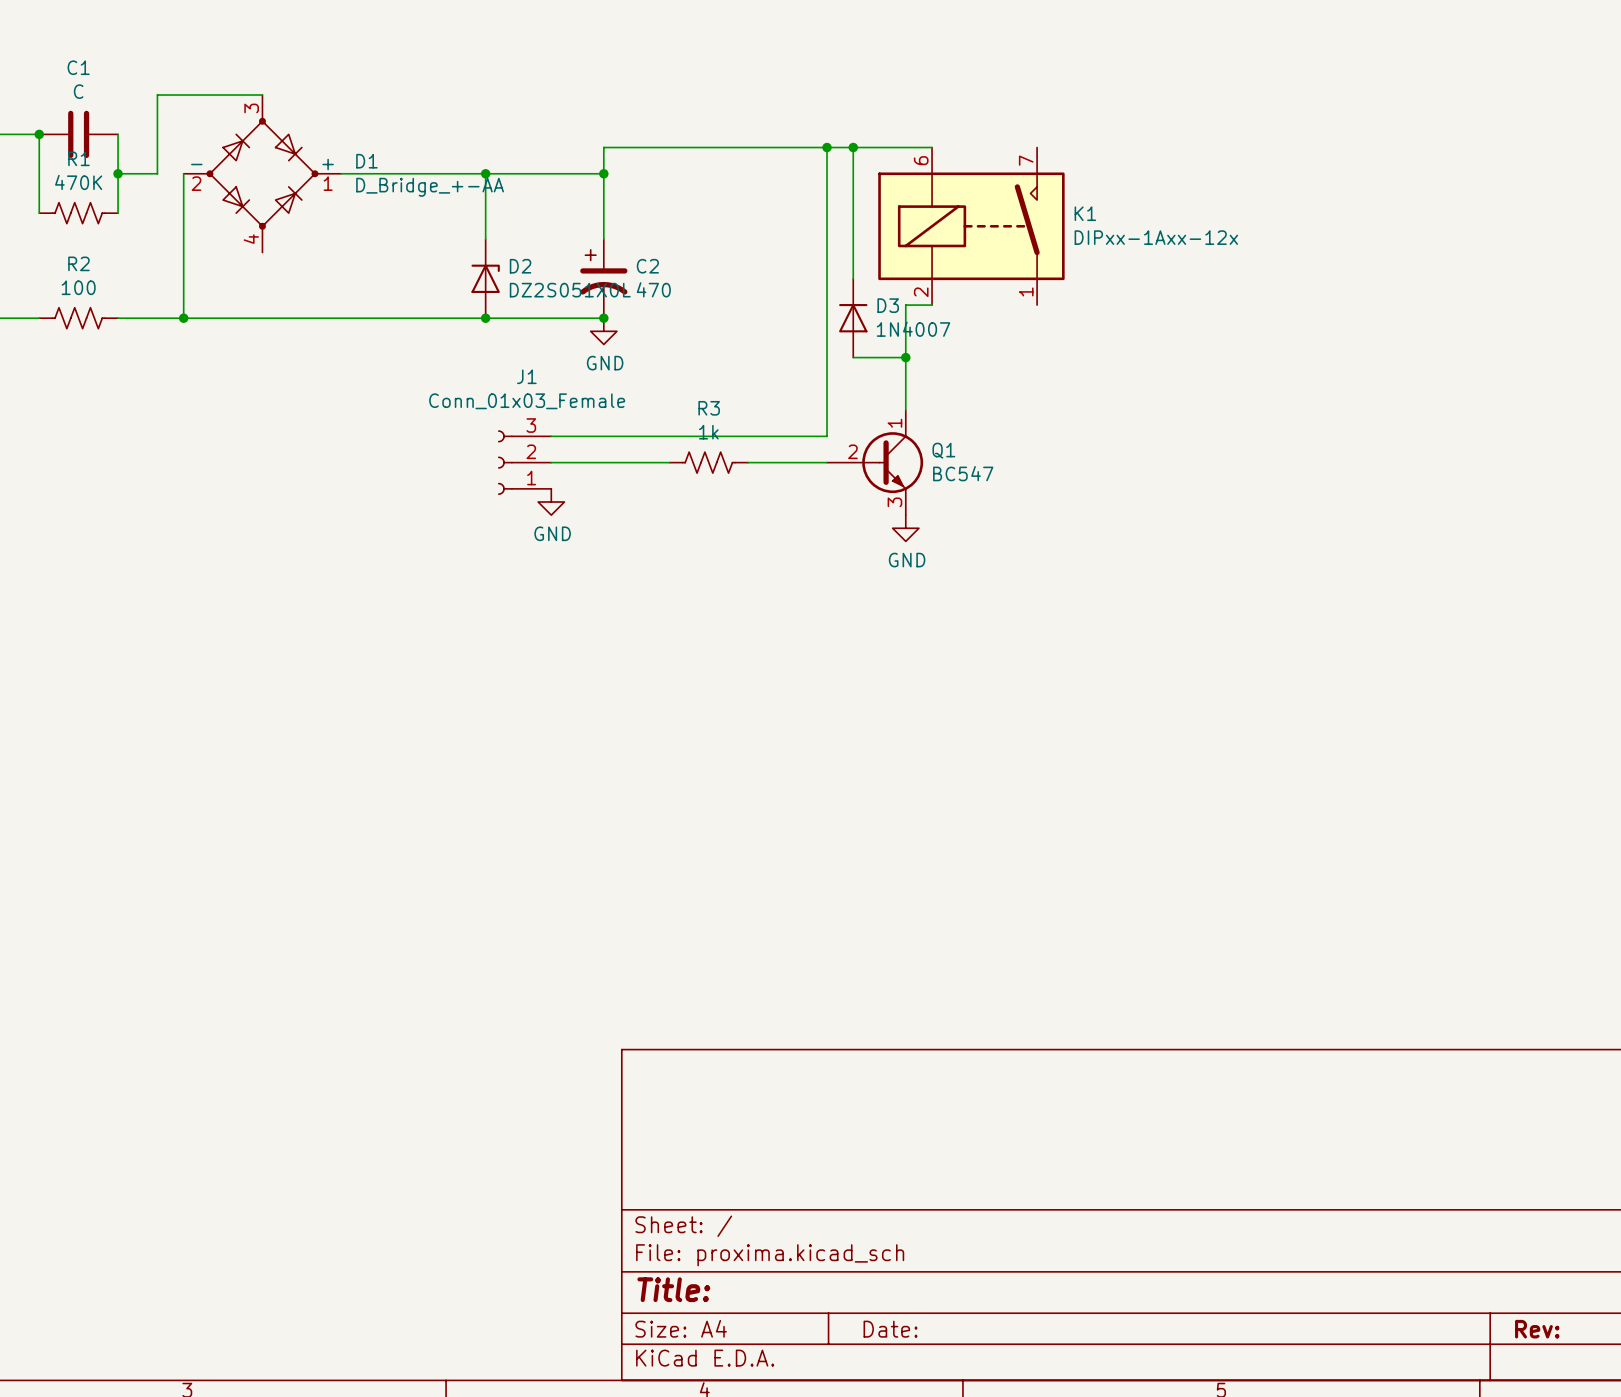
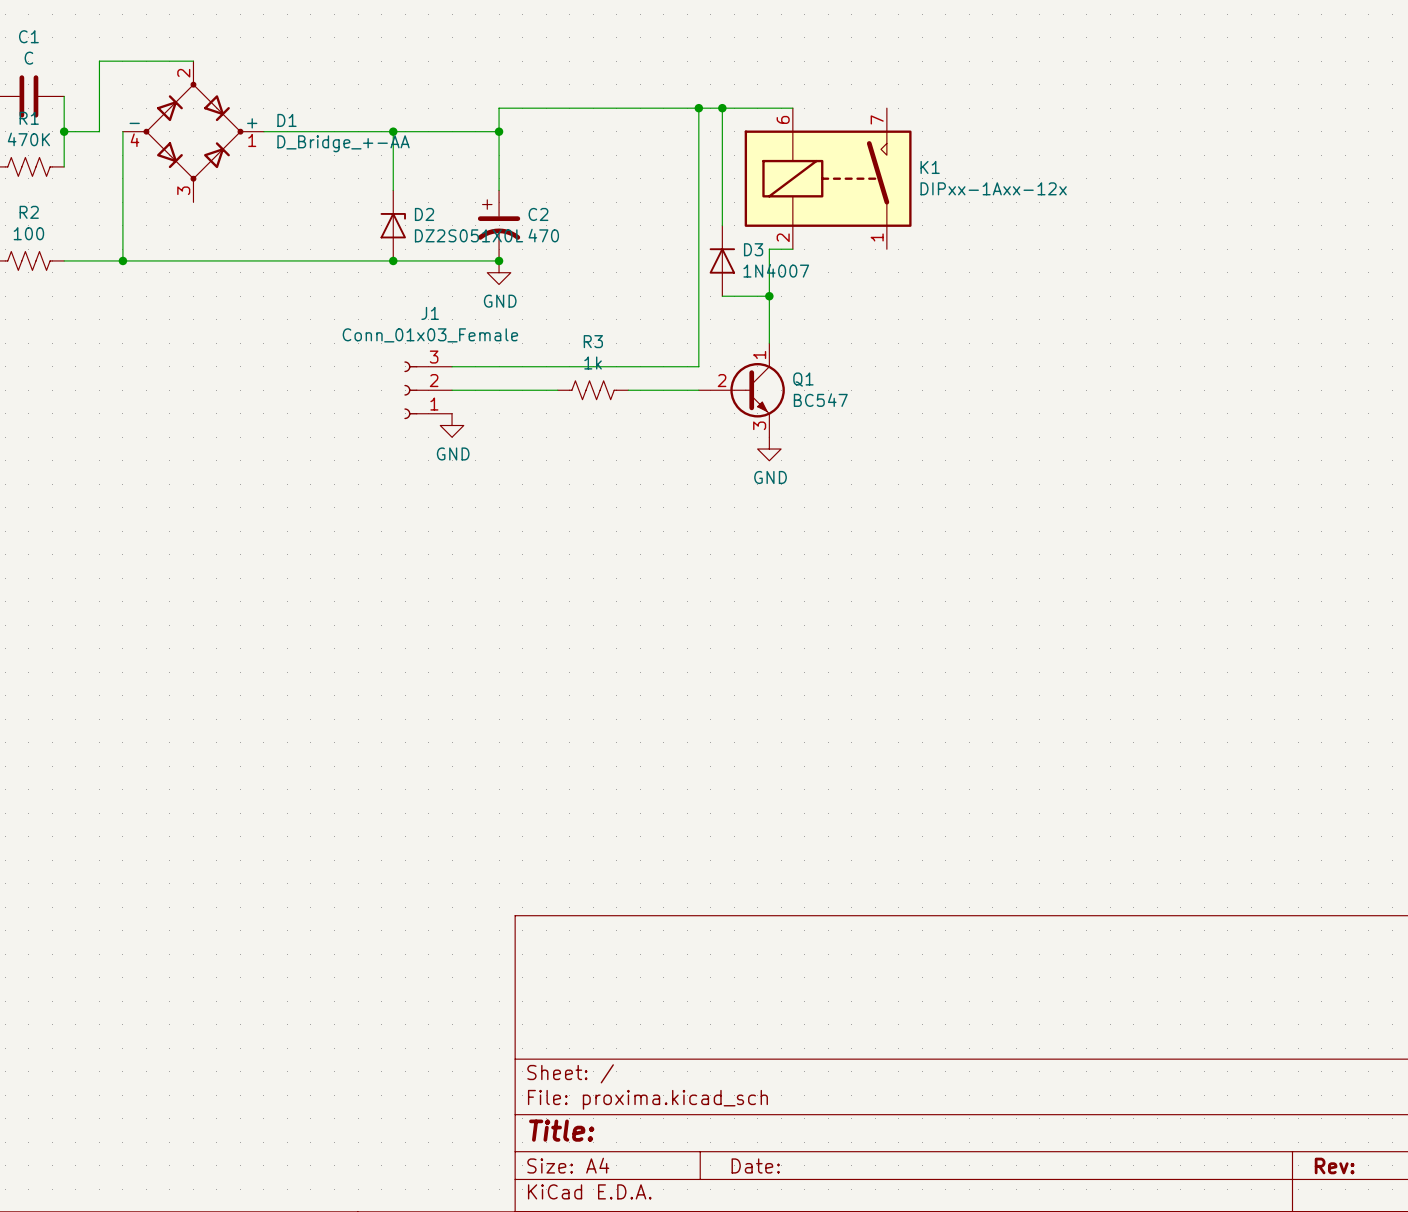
D1 symbol: [183, 95, 342, 253] -> [122, 61, 264, 203]

